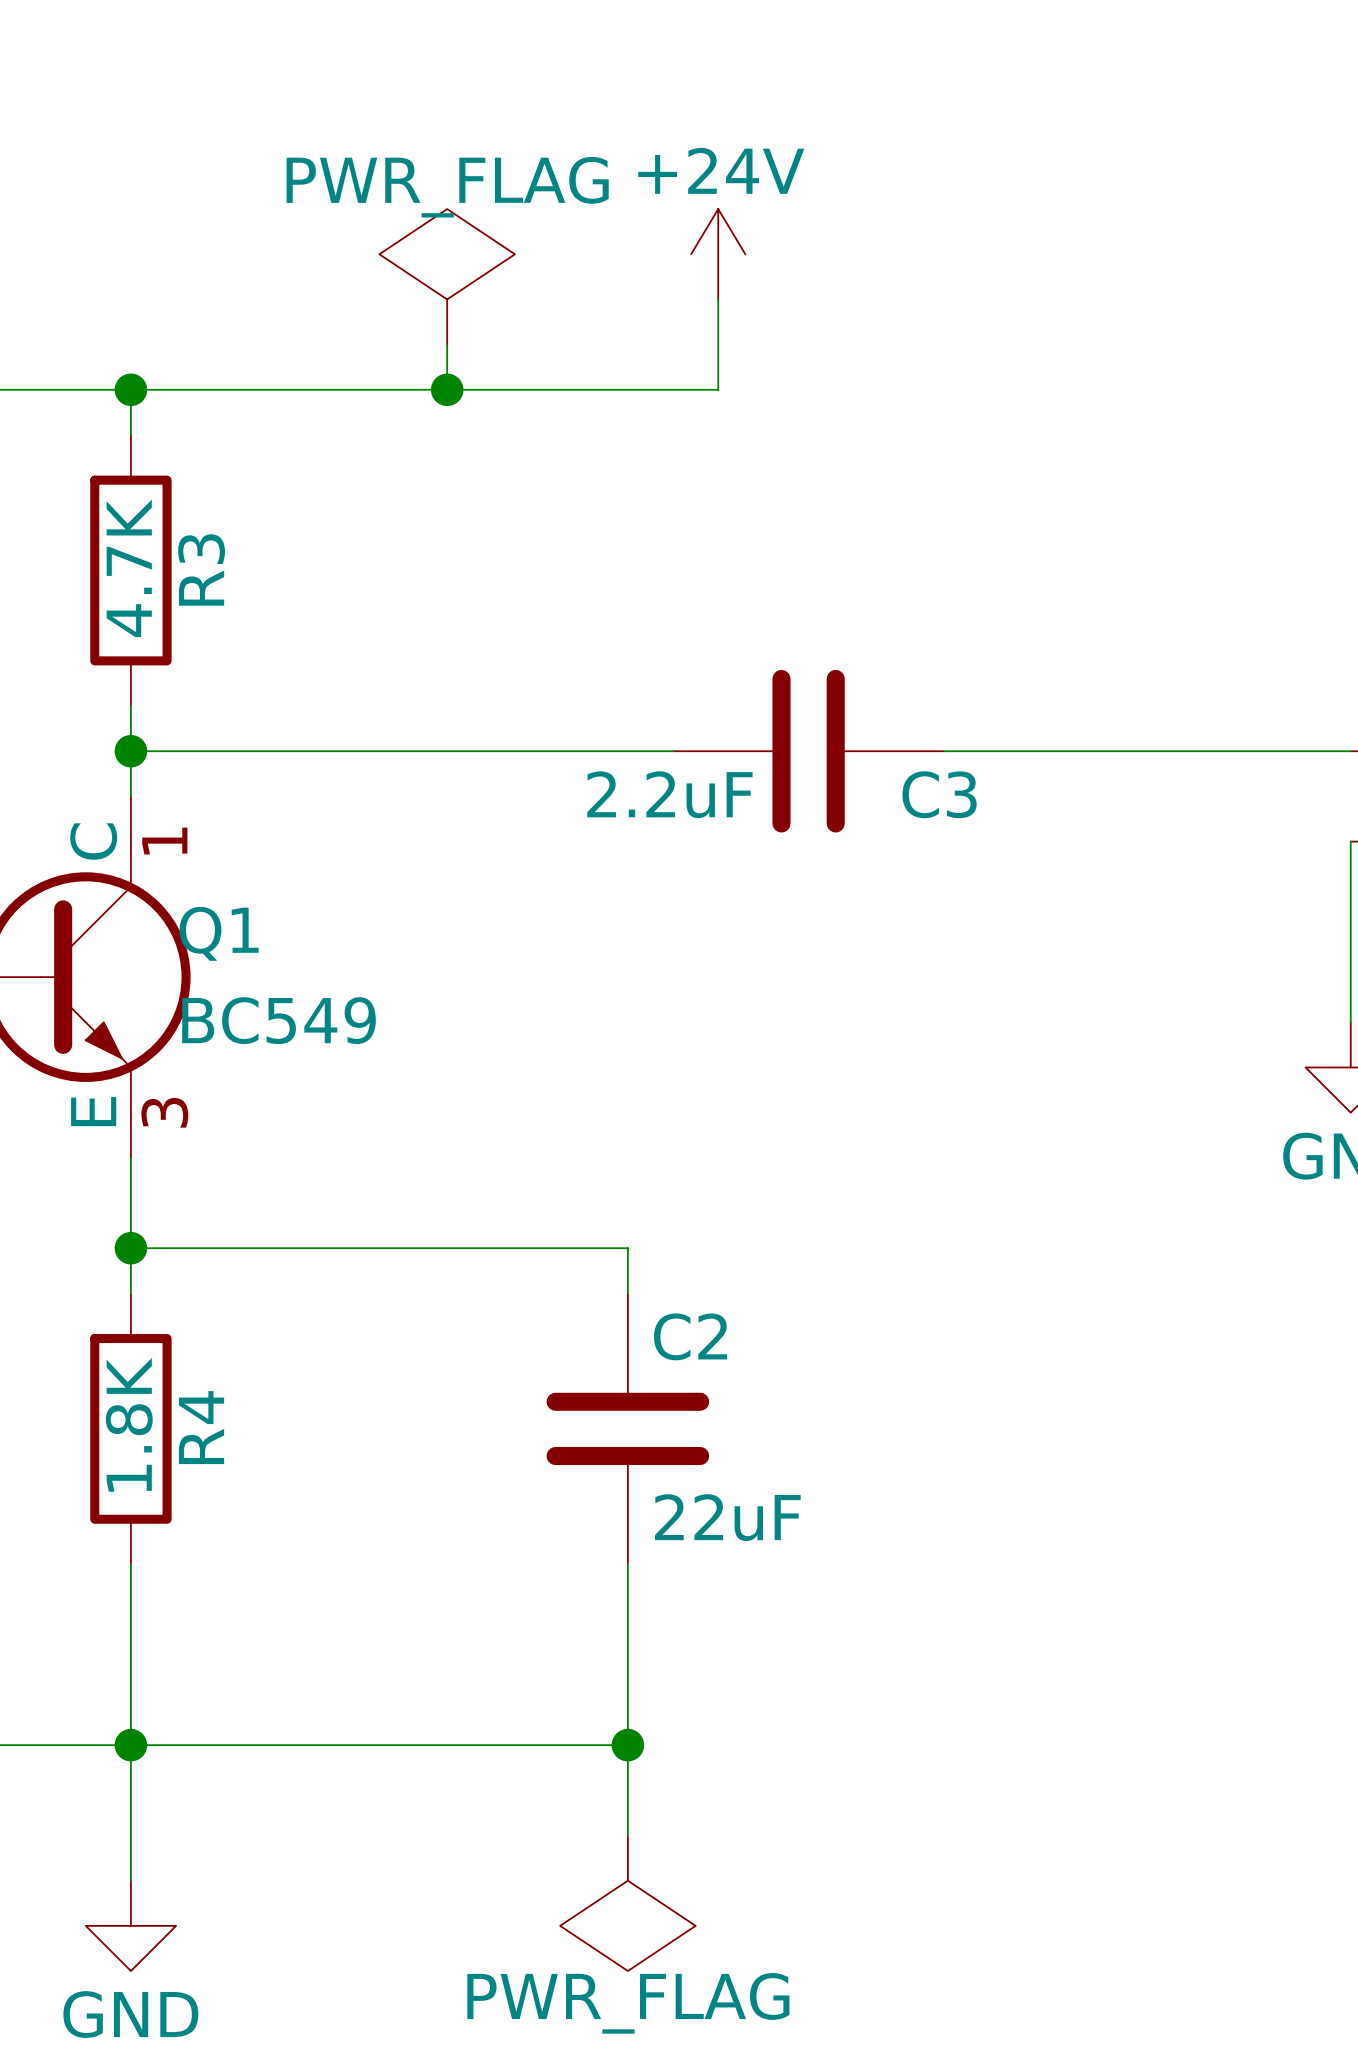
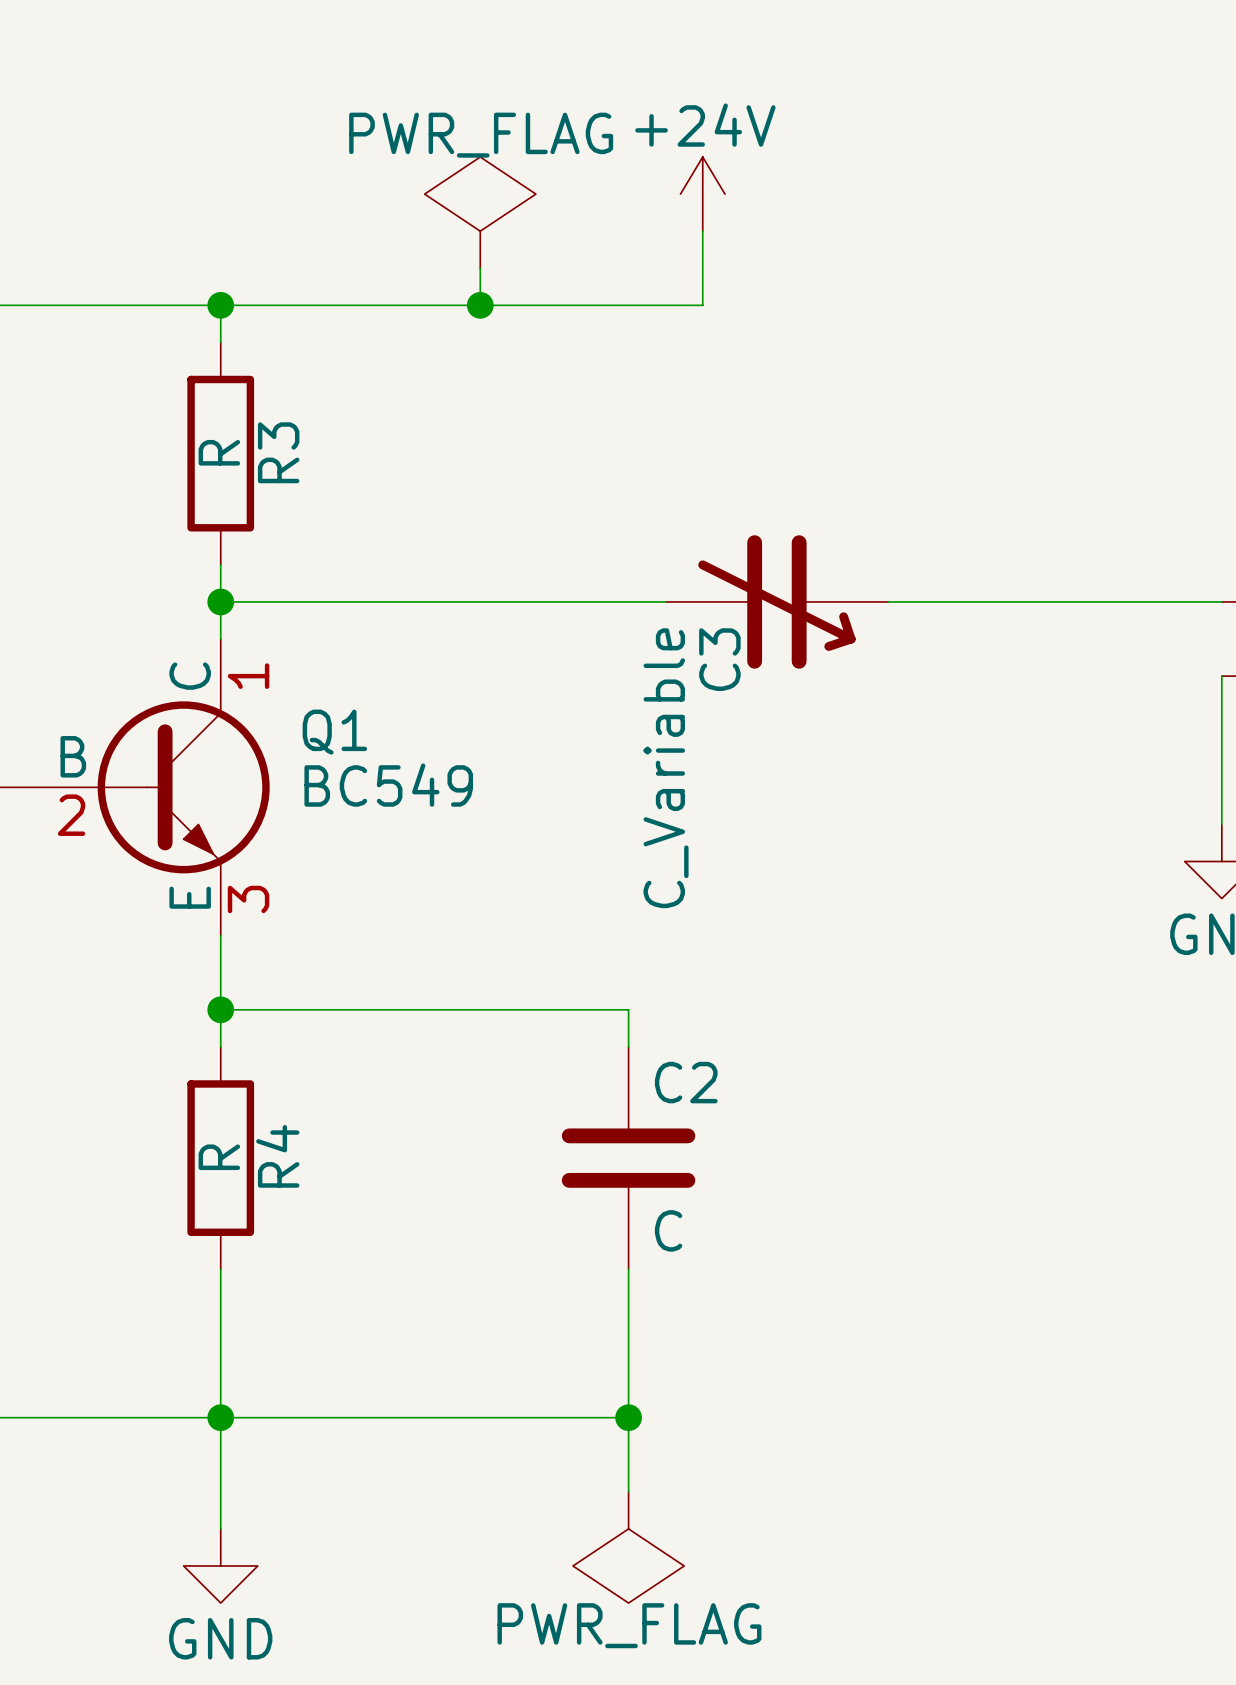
R3 value: 4.7K (129, 568) -> R (219, 452)
C3 symbol: [673, 669, 945, 833] -> [665, 535, 889, 669]
C3 value: 2.2uF (669, 794) -> C_Variable (666, 768)
C3 name position: C3 (939, 794) -> C3 (719, 659)
Q1 name position: Q1 (219, 933) -> Q1 (334, 732)
Q1 value position: BC549 (279, 1020) -> BC549 (388, 785)
R4 value: 1.8K (129, 1424) -> R (219, 1157)
C2 value: 22uF (727, 1517) -> C (668, 1230)

